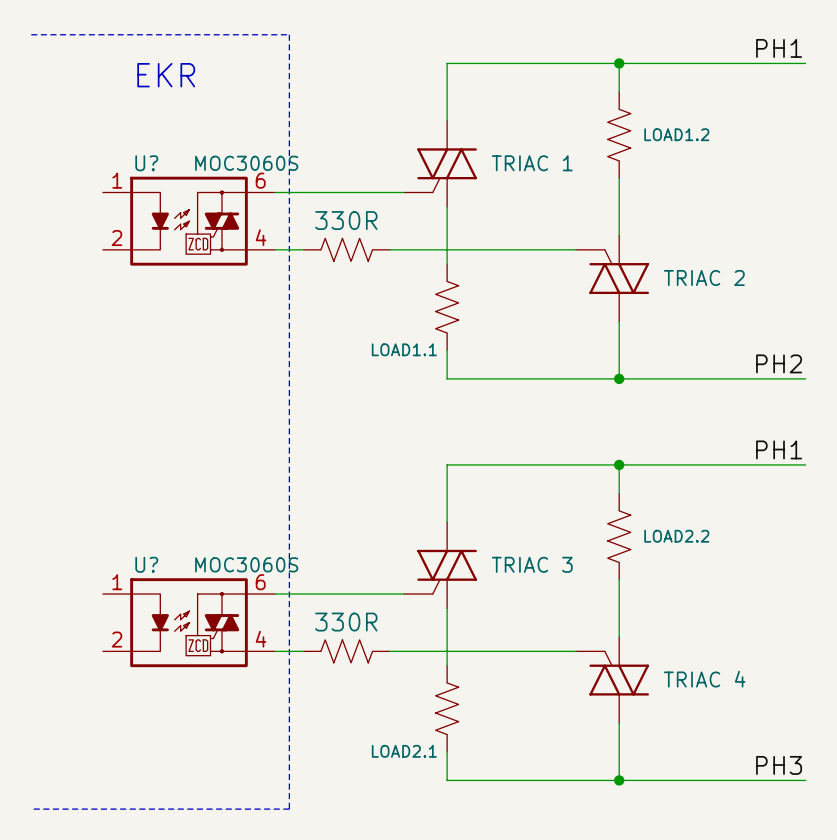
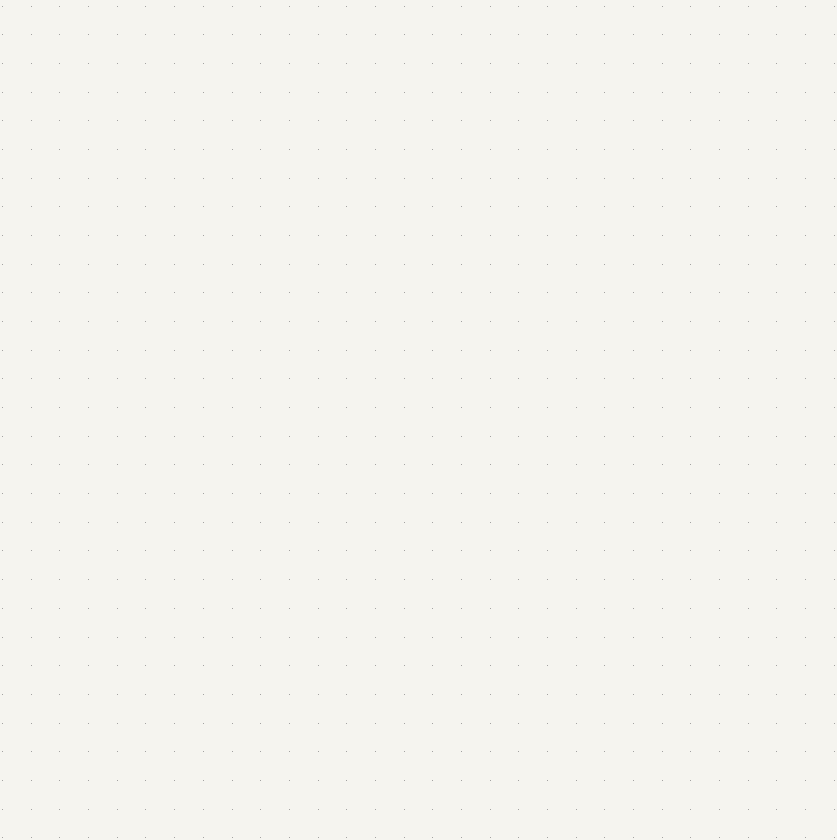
line: (31, 34) (289, 34) (289, 809) (31, 809) -> none
label: PH1 (779, 48) -> none
wire: (619, 63) (619, 92) -> none
junction: (619, 63) -> none
wire: (805, 63) (447, 63) (447, 120) -> none
text: EKR (166, 75) -> none
part: LOAD1.2 (619, 135) -> none
part: TRIAC 1 (440, 163) -> none
wire: (619, 178) (619, 235) -> none
wire: (275, 192) (404, 192) -> none
wire: (447, 206) (447, 264) -> none
U?: (188, 221) -> none
wire: (275, 249) (303, 249) -> none
part: 330R (346, 249) -> none
wire: (389, 249) (576, 249) -> none
part: TRIAC 2 (612, 278) -> none
part: LOAD1.1 (447, 307) -> none
wire: (619, 321) (619, 378) -> none
wire: (447, 350) (447, 378) (805, 378) -> none
label: PH2 (779, 363) -> none
junction: (619, 378) -> none
label: PH1 (779, 449) -> none
wire: (619, 464) (619, 493) -> none
junction: (619, 464) -> none
wire: (805, 464) (447, 464) (447, 522) -> none
part: LOAD2.2 (619, 536) -> none
part: TRIAC 3 (440, 565) -> none
wire: (619, 579) (619, 637) -> none
wire: (275, 594) (404, 594) -> none
wire: (447, 608) (447, 665) -> none
U?: (188, 622) -> none
wire: (275, 651) (303, 651) -> none
part: 330R (346, 651) -> none
wire: (389, 651) (576, 651) -> none
part: TRIAC 4 (612, 680) -> none
part: LOAD2.1 (447, 708) -> none
wire: (619, 723) (619, 780) -> none
wire: (447, 751) (447, 780) (805, 780) -> none
label: PH3 (779, 765) -> none
junction: (619, 780) -> none

